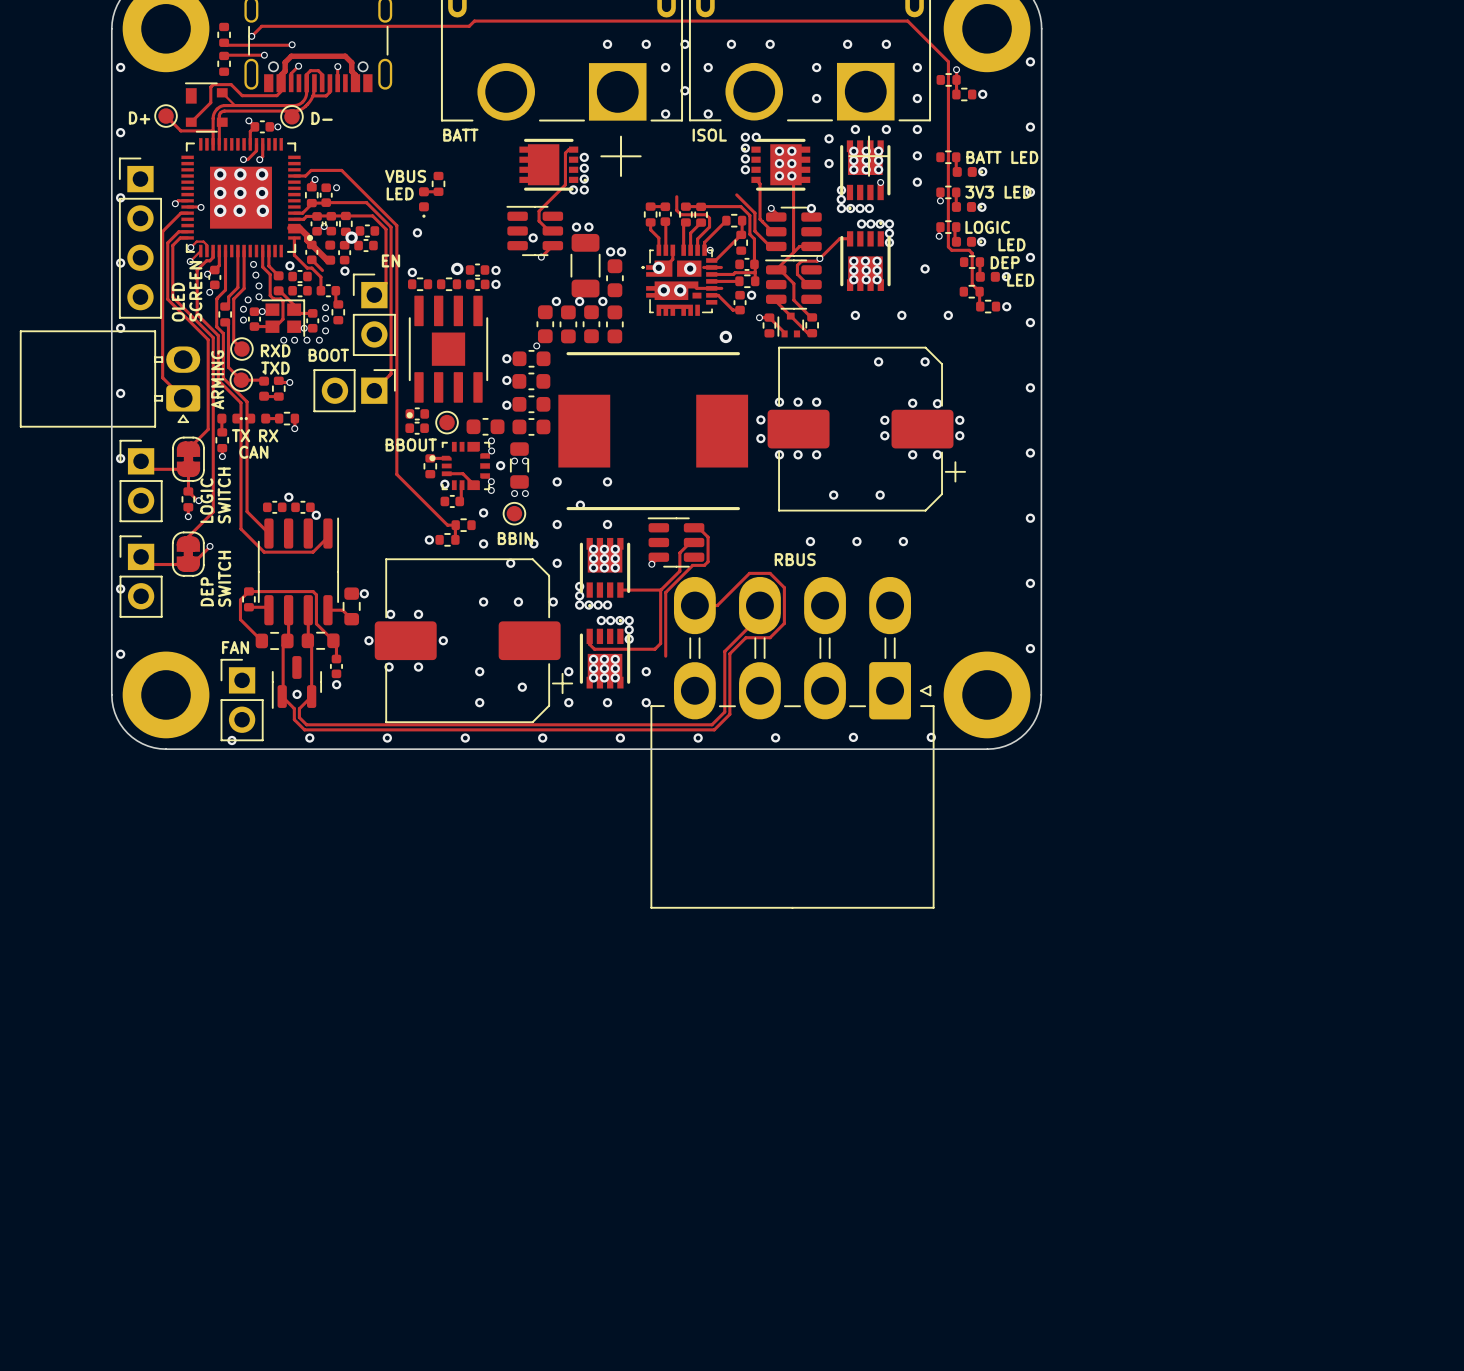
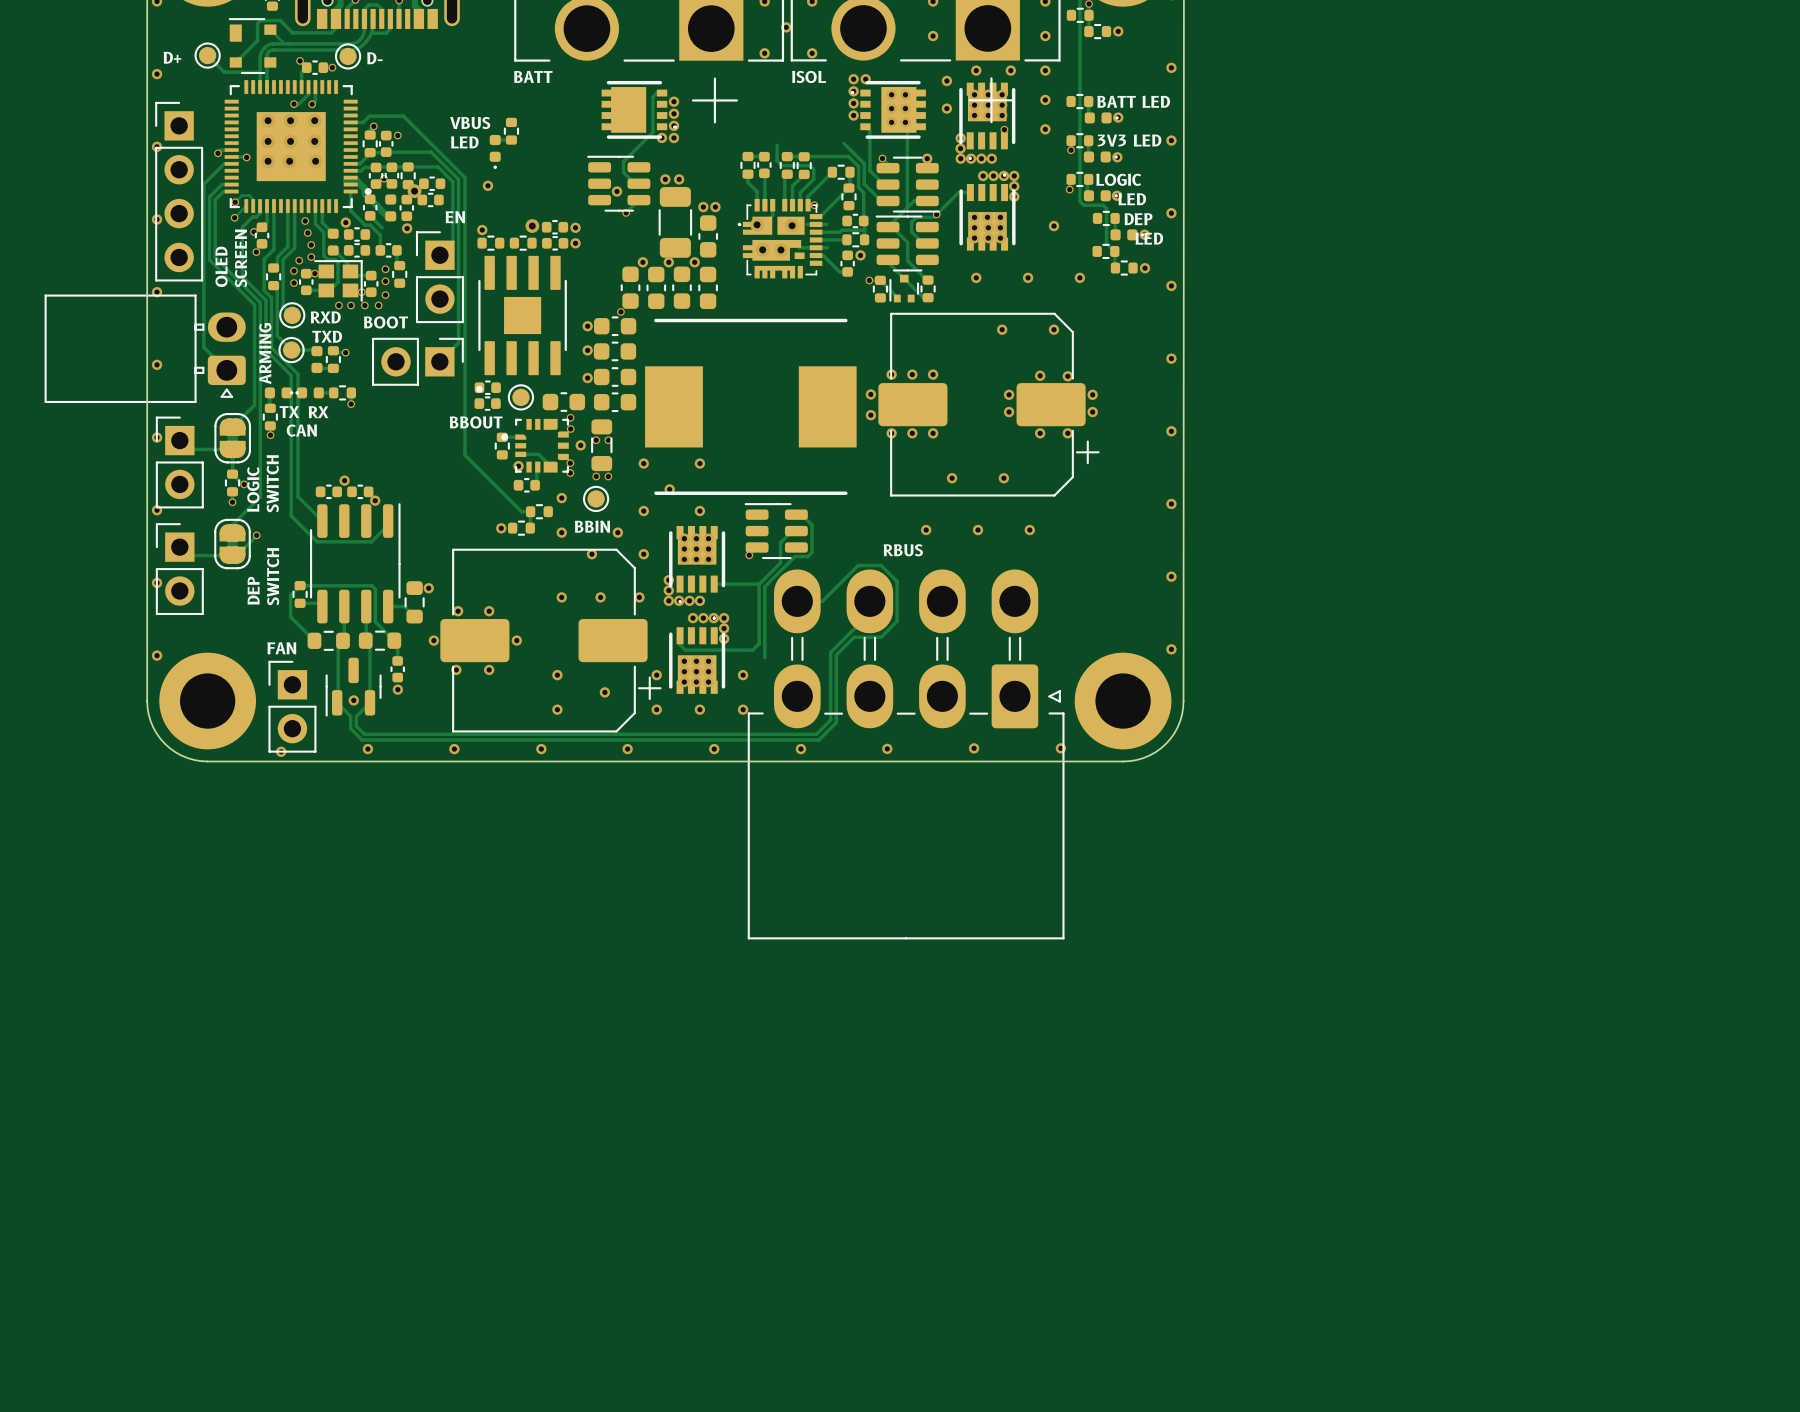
via: (725, 336) -> none
via: none -> (157, 510)

